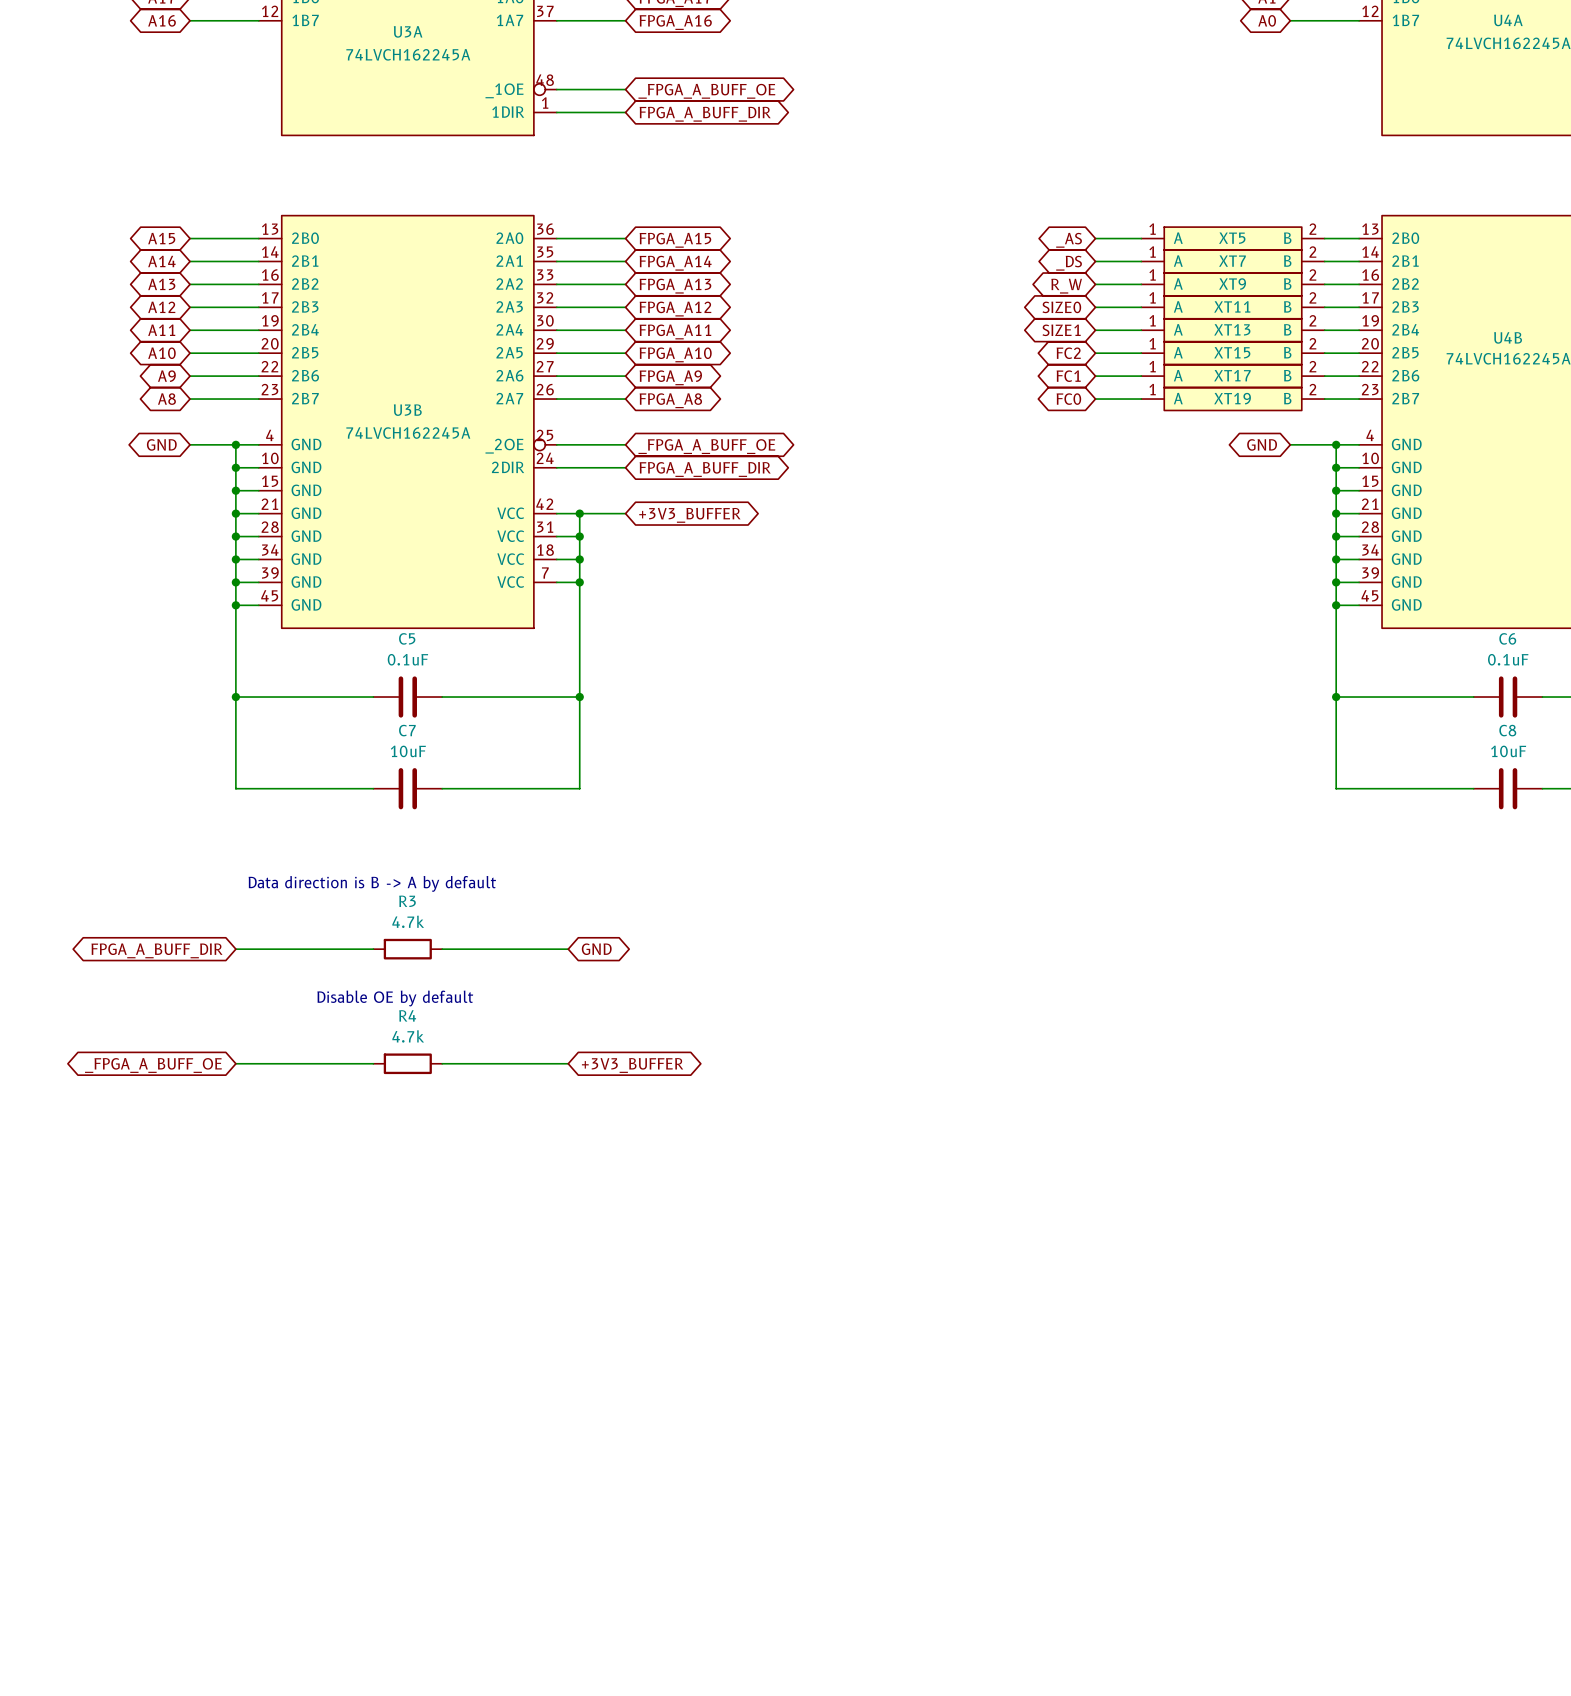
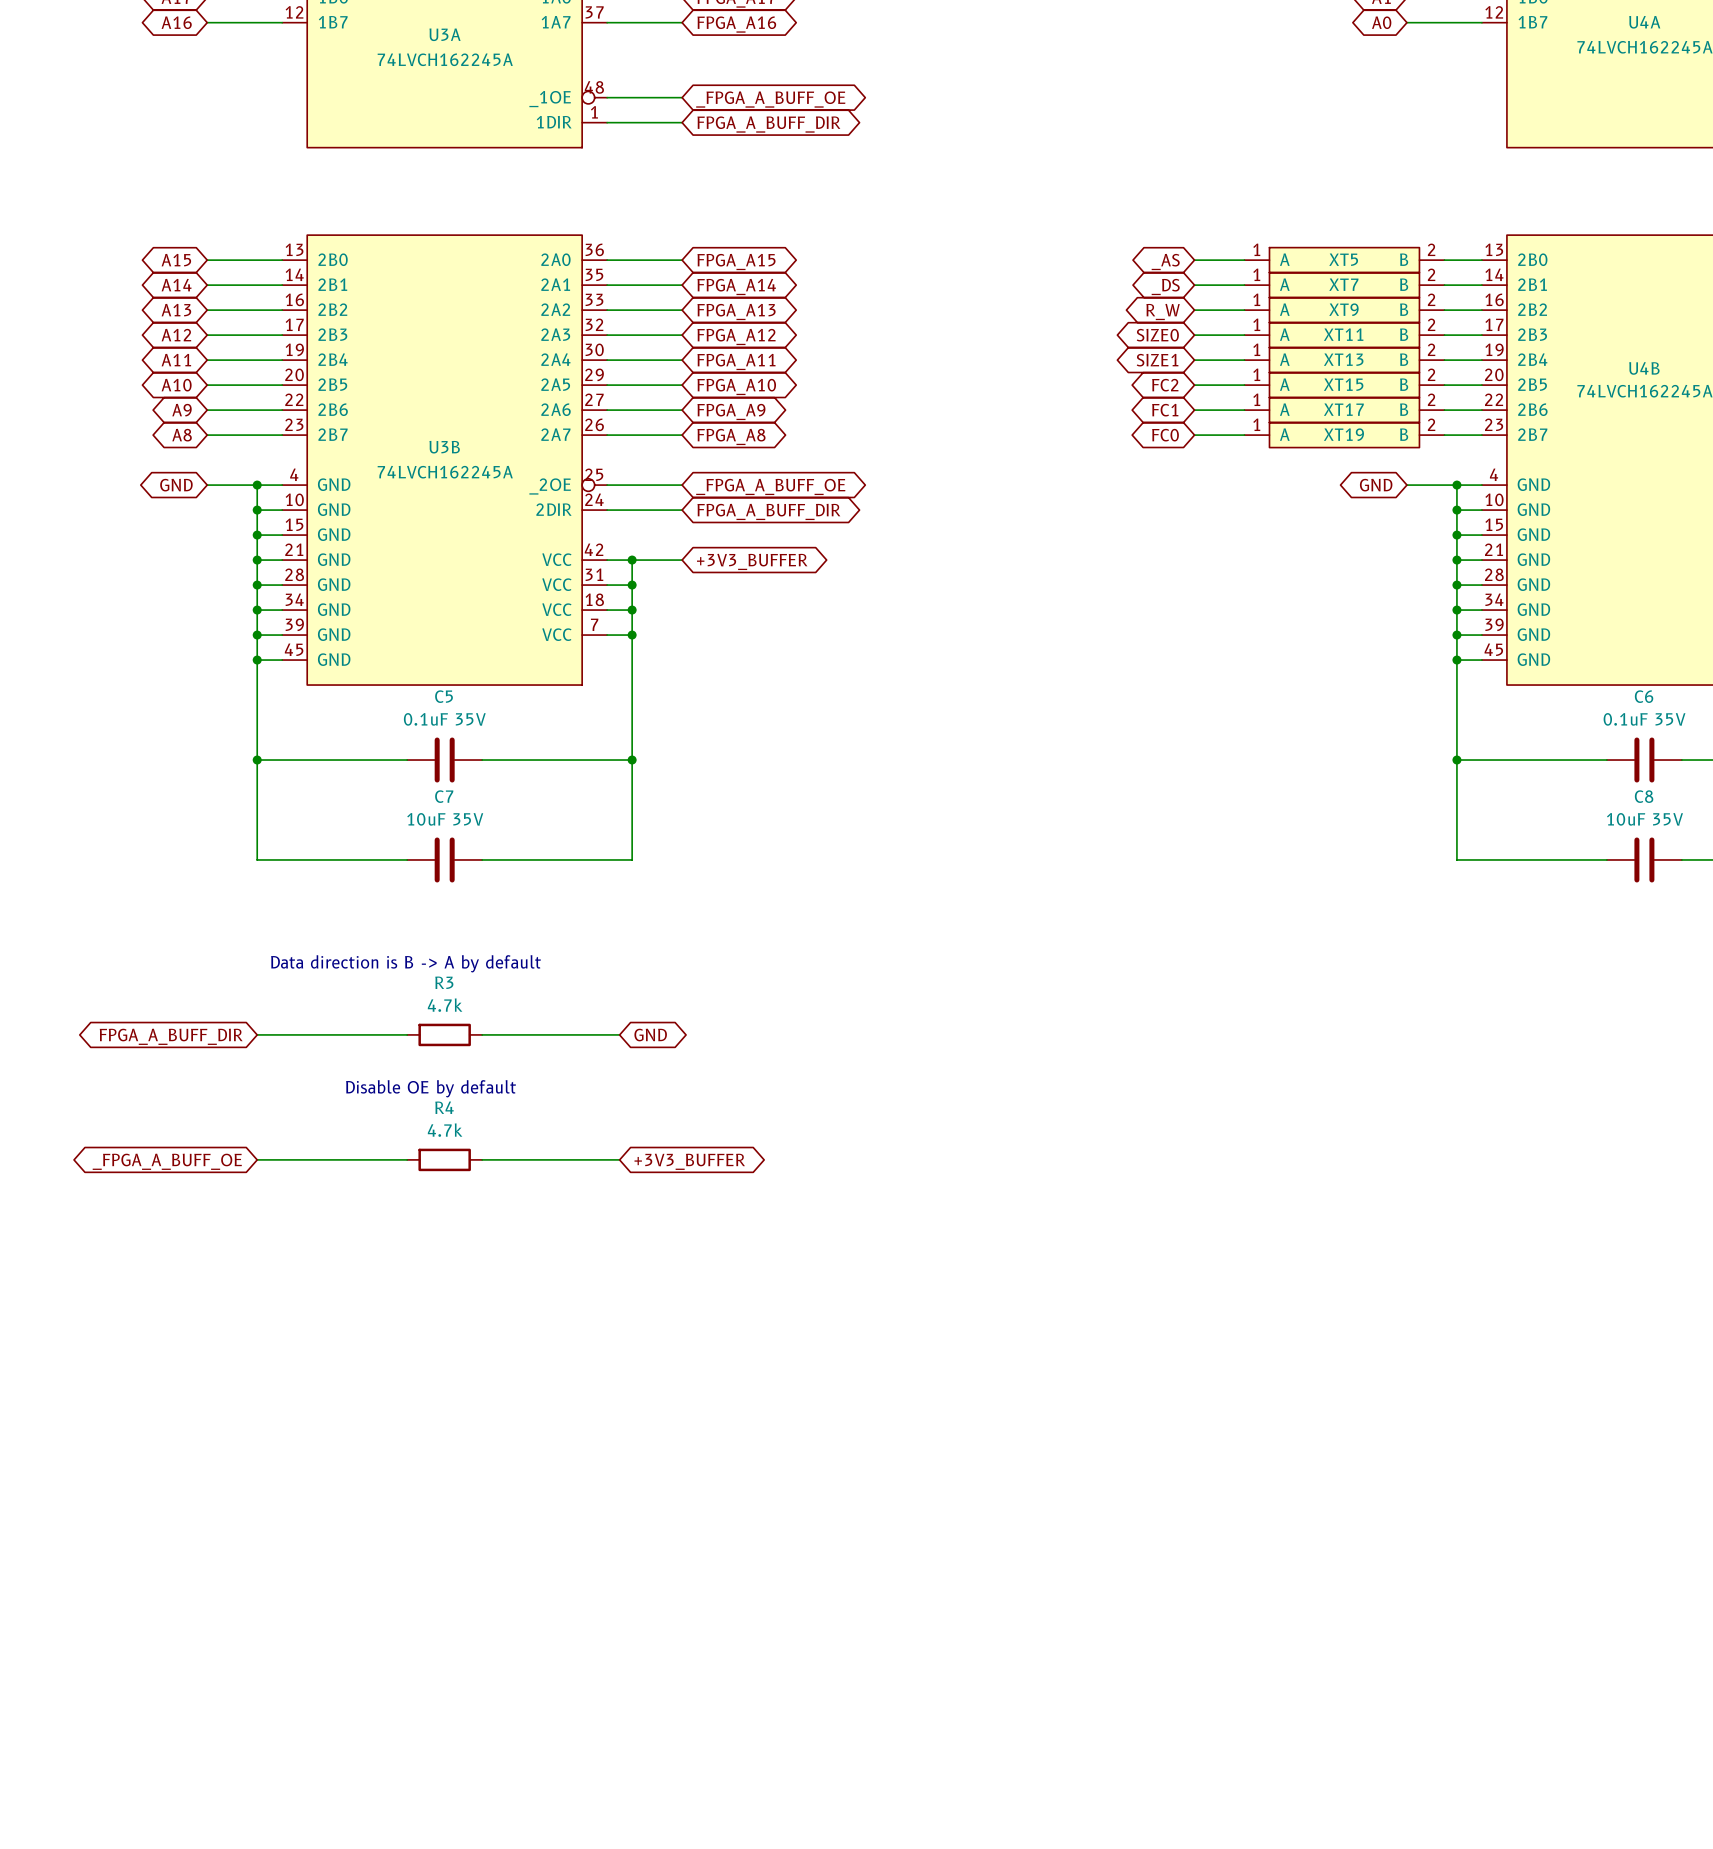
C5 value: 0.1uF (407, 659) -> 0.1uF 35V (444, 719)
C6 value: 0.1uF (1508, 659) -> 0.1uF 35V (1644, 719)
C7 value: 10uF (408, 751) -> 10uF 35V (445, 819)
C8 value: 10uF (1508, 751) -> 10uF 35V (1644, 819)

